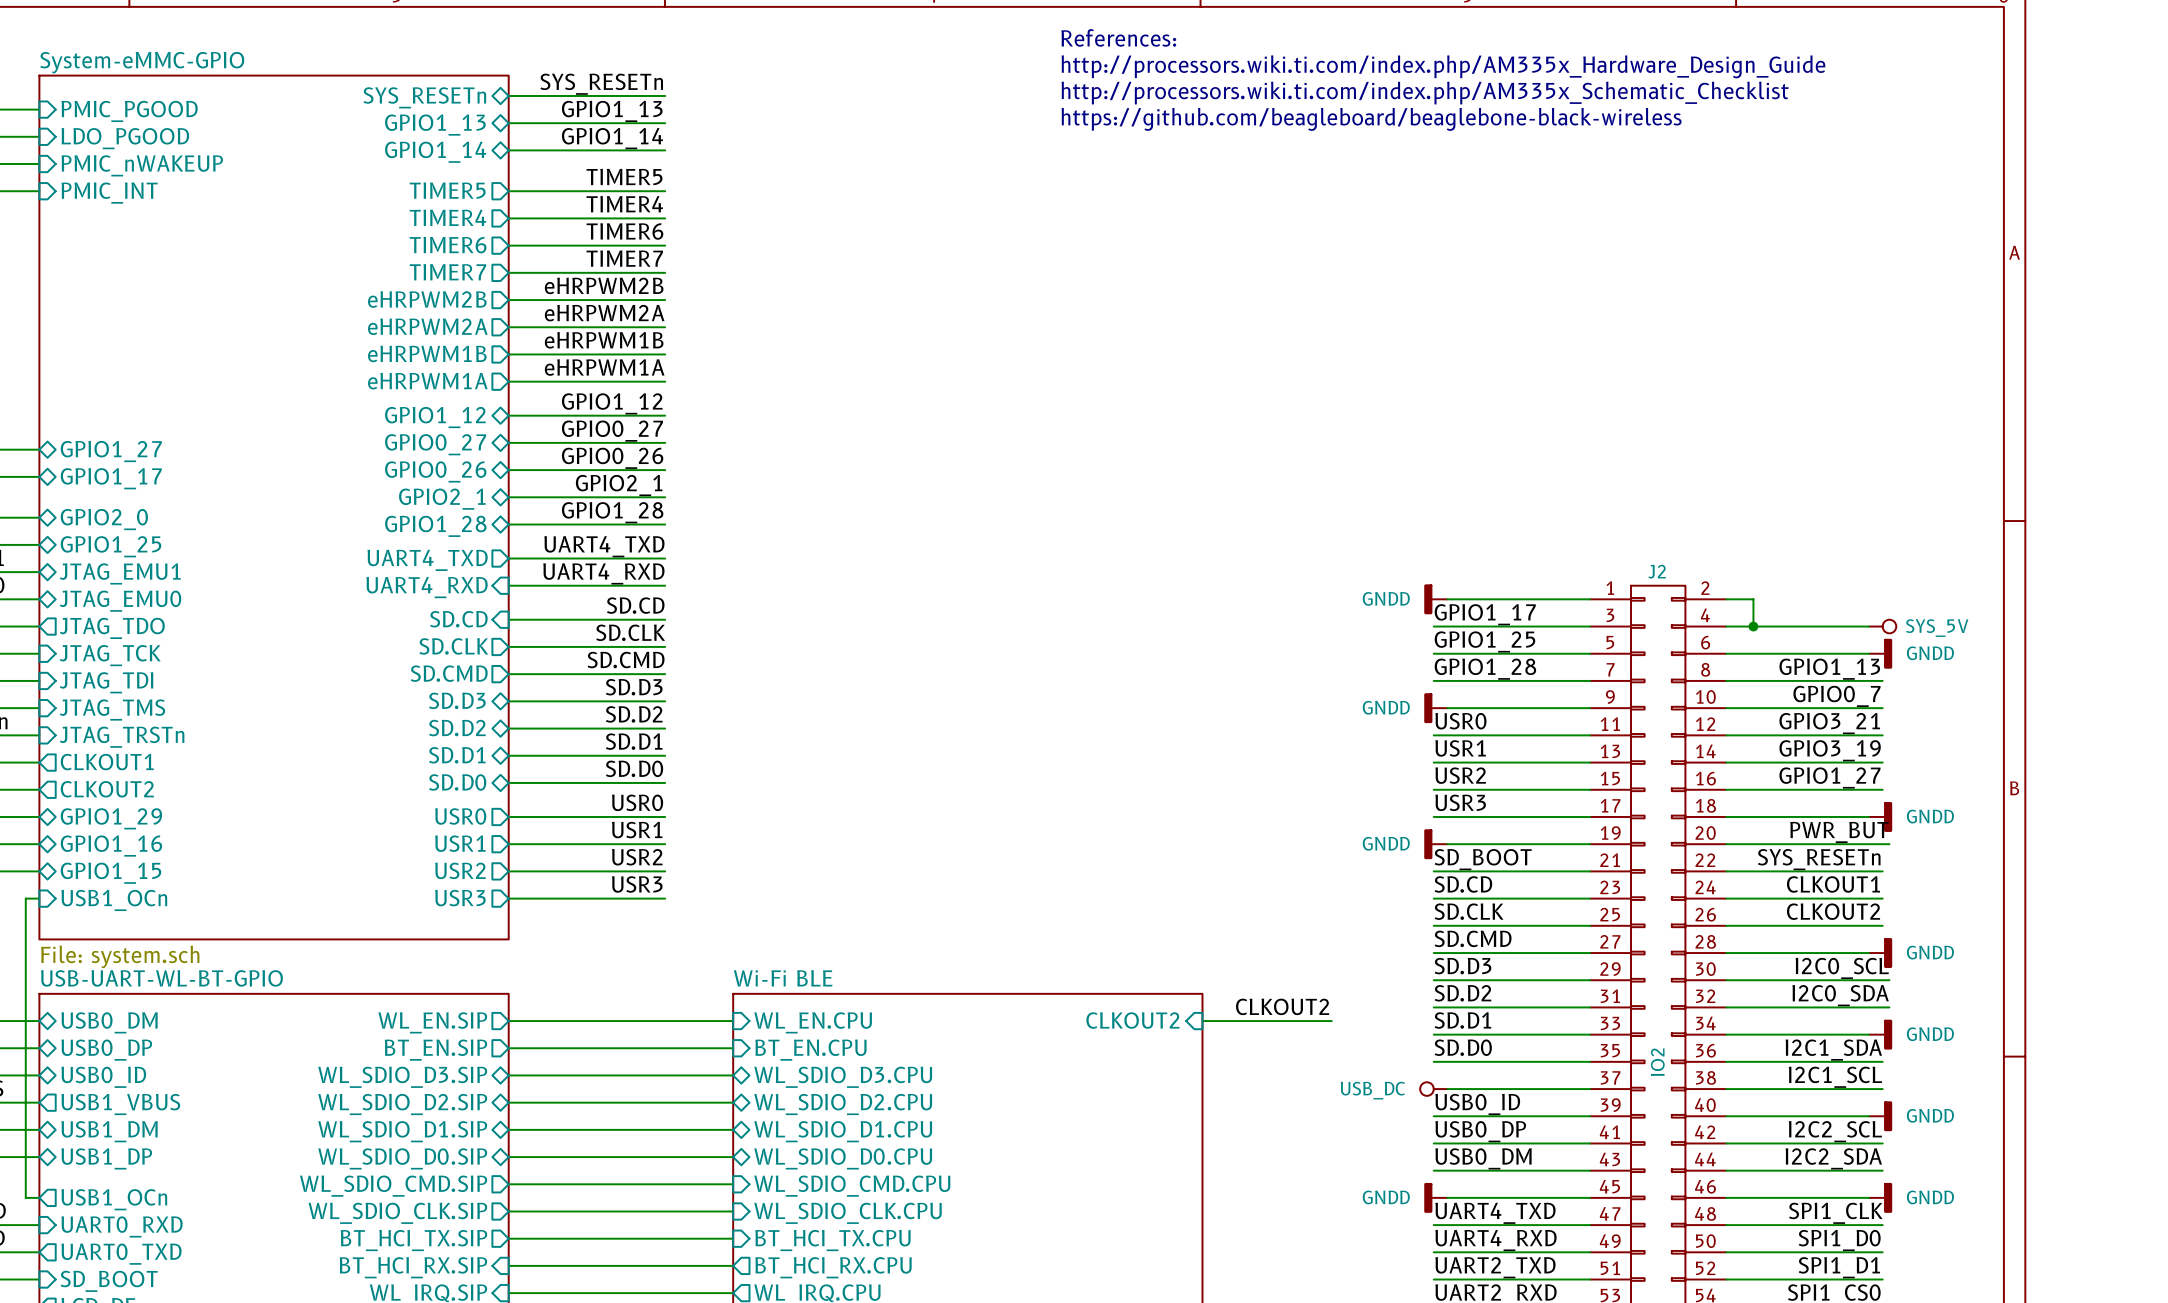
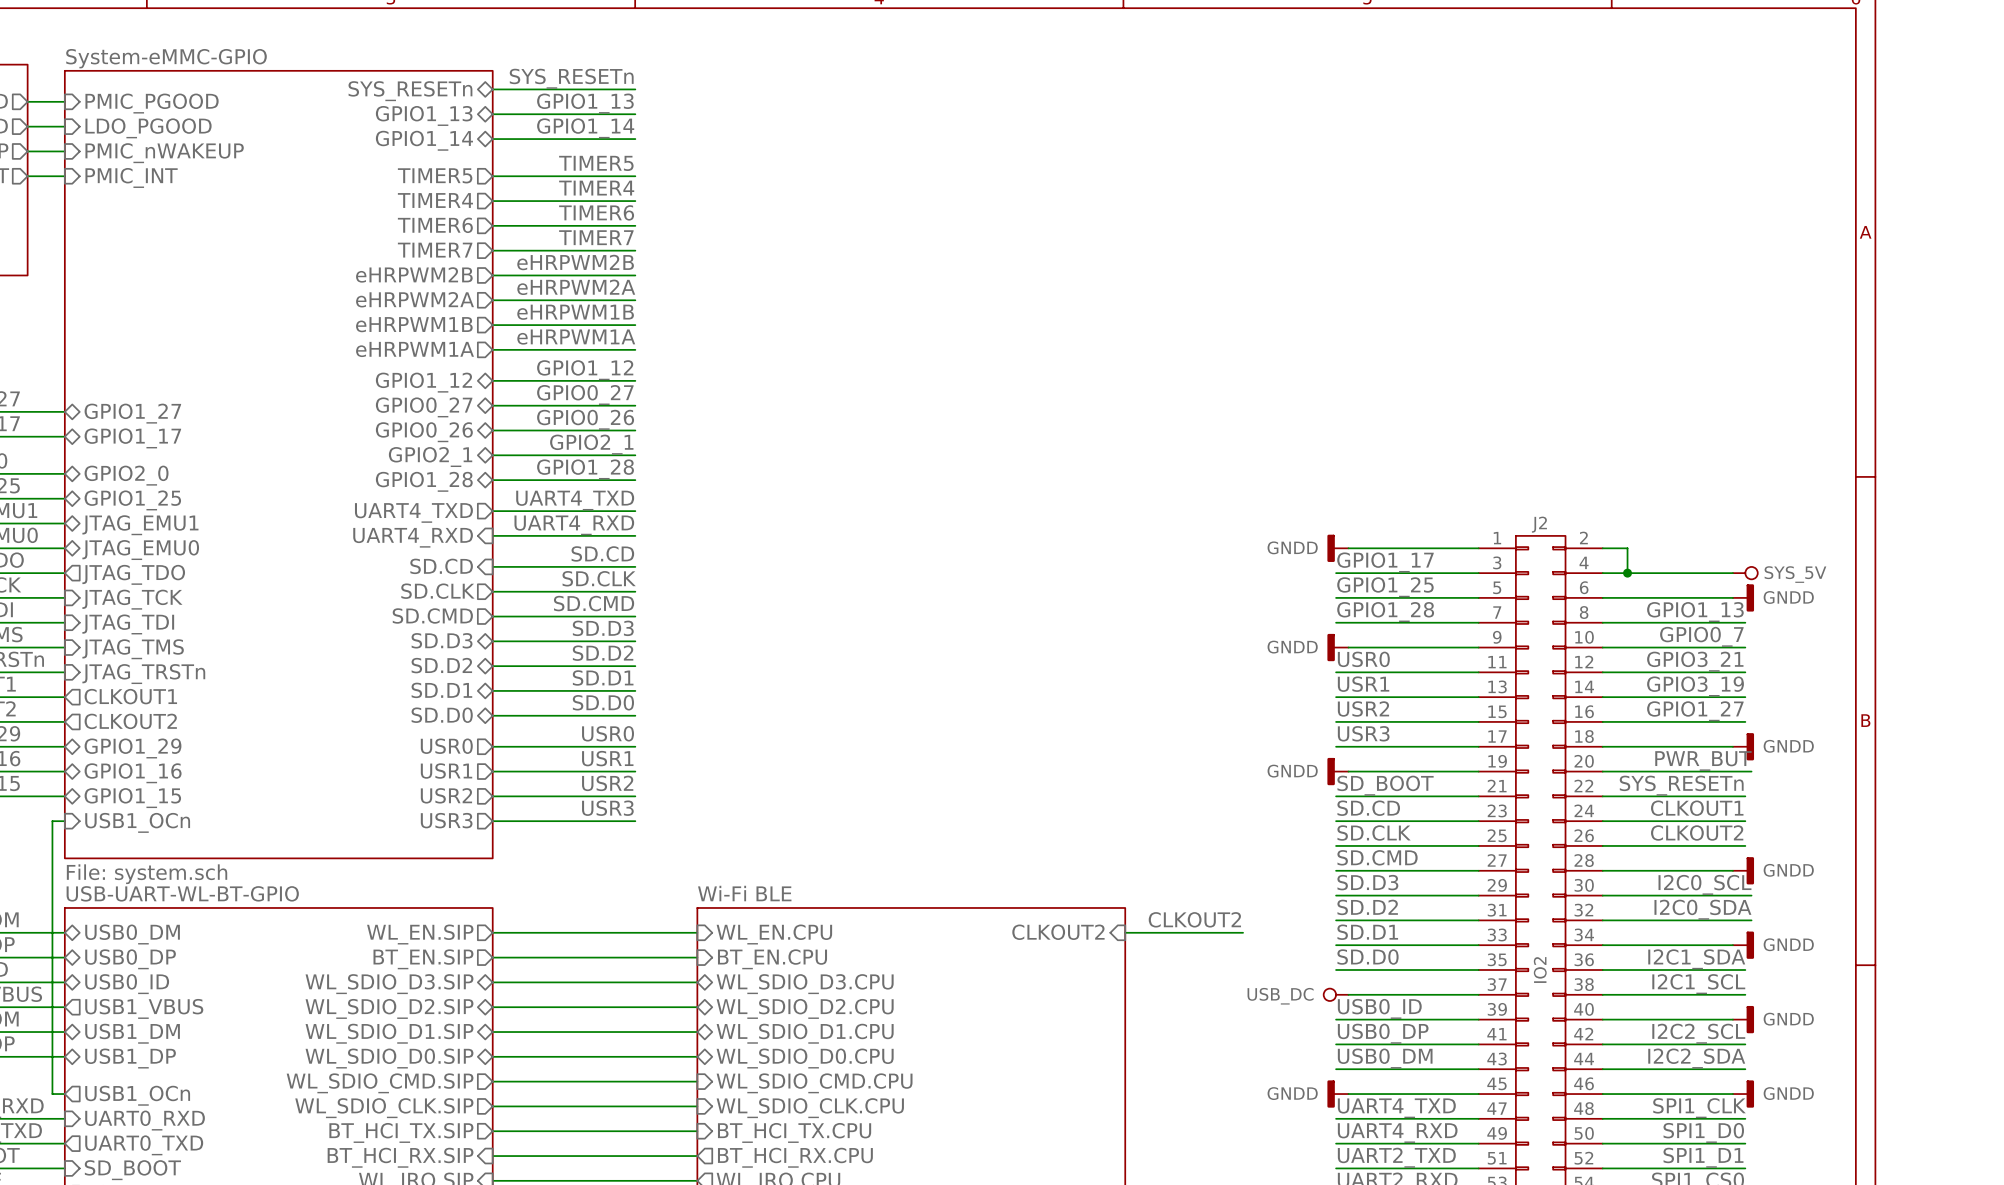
text: References: (1118, 37) -> none
text: http://processors.wiki.ti.com/index.php/AM335x_Hardware_Design_Guide (1443, 66) -> none
text: http://processors.wiki.ti.com/index.php/AM335x_Schematic_Checklist (1425, 93) -> none
text: https://github.com/beagleboard/beaglebone-black-wireless (1371, 119) -> none

